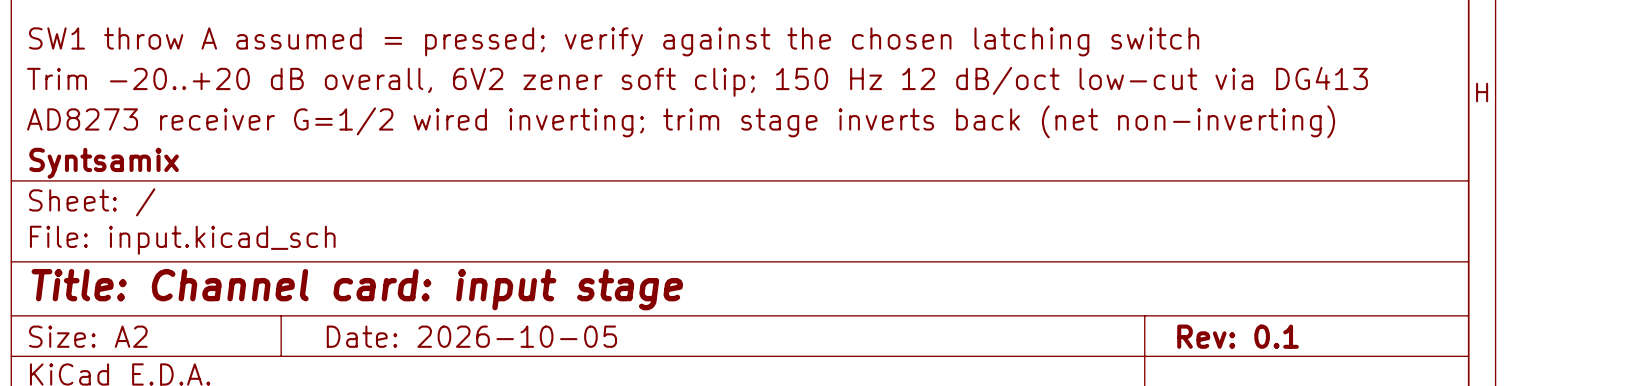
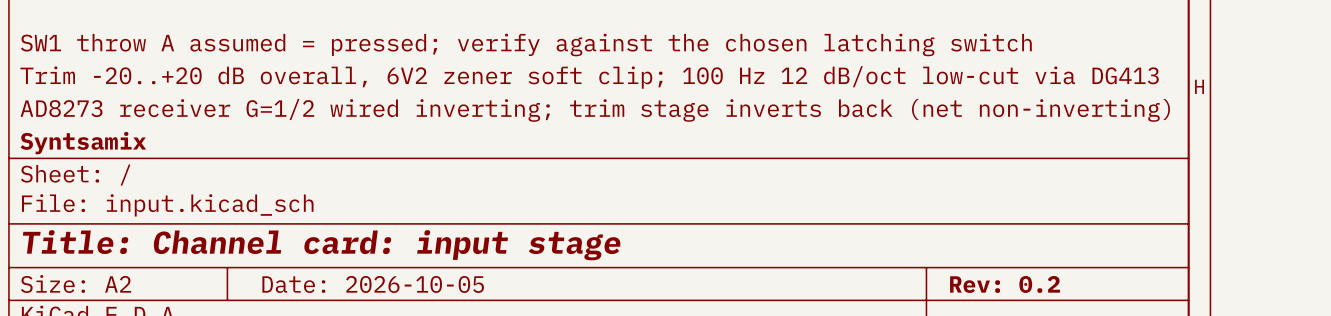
title block: Trim -20..+20 dB overall, 6V2 zener soft clip; 150 Hz 12 dB/oct low-cut via DG413 (697, 81) -> Trim -20..+20 dB overall, 6V2 zener soft clip; 100 Hz 12 dB/oct low-cut via DG413 (589, 77)
title block: Rev: 0.1 (1238, 336) -> Rev: 0.2 (1005, 284)

